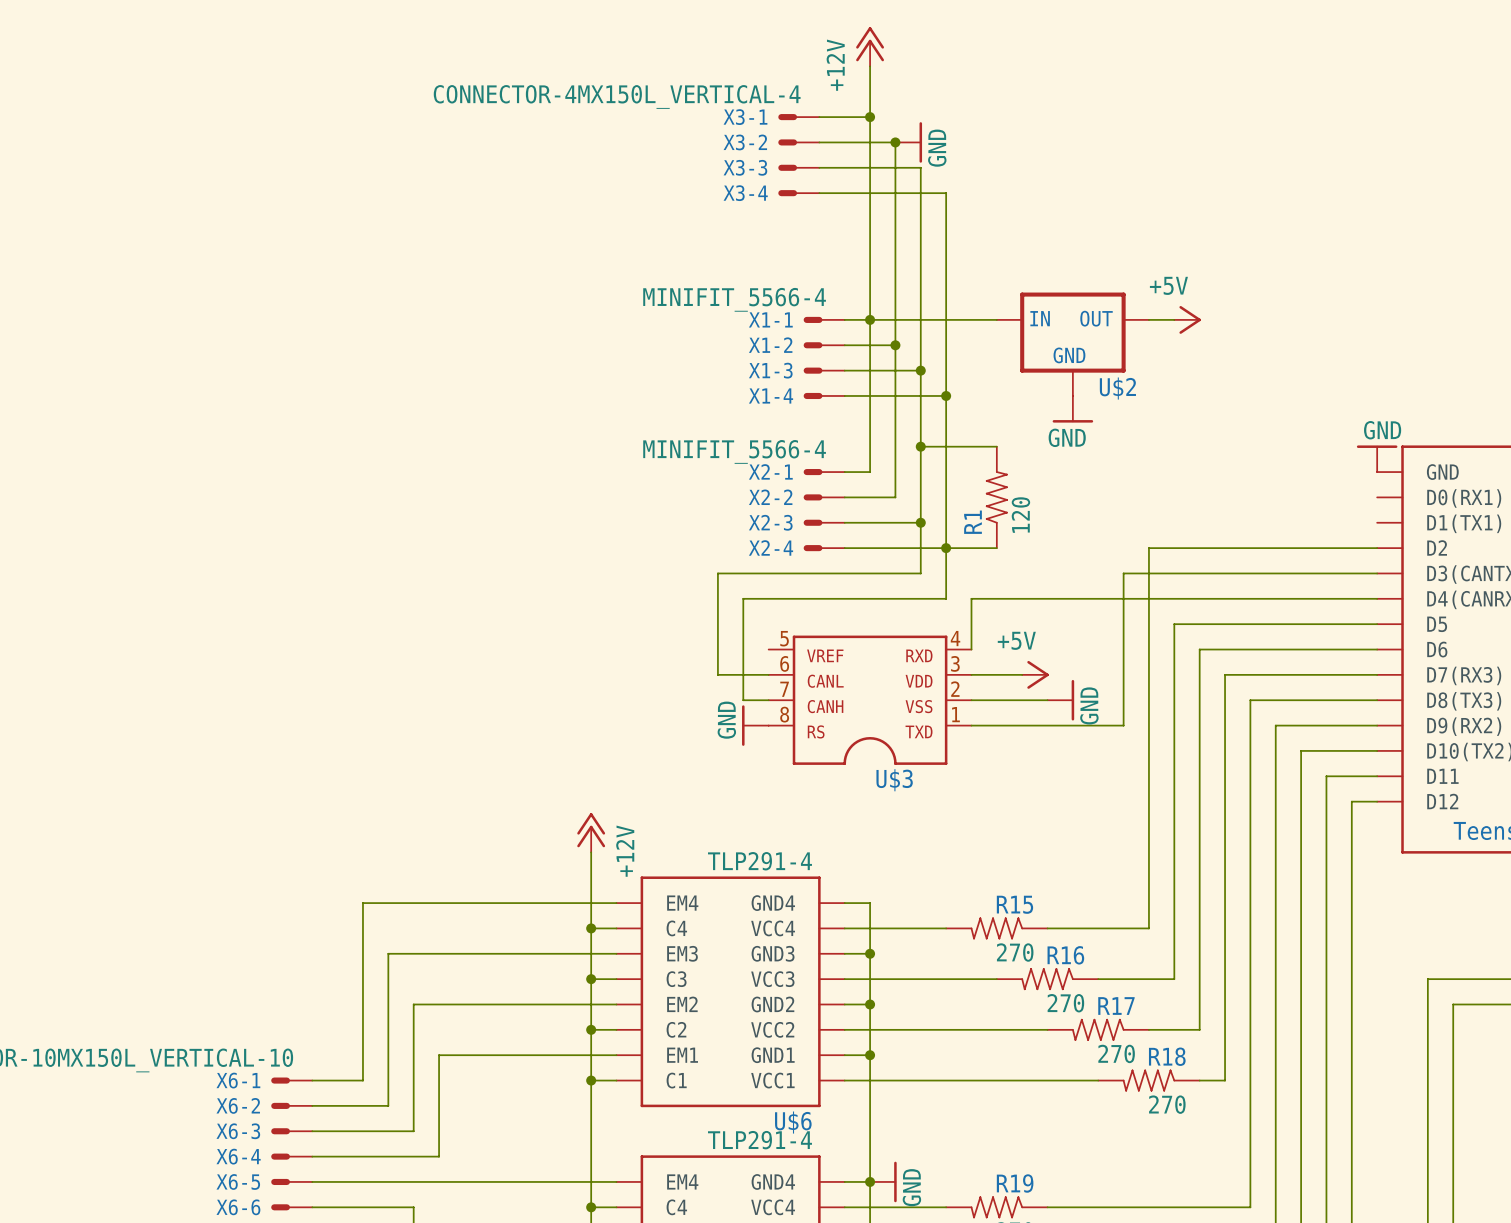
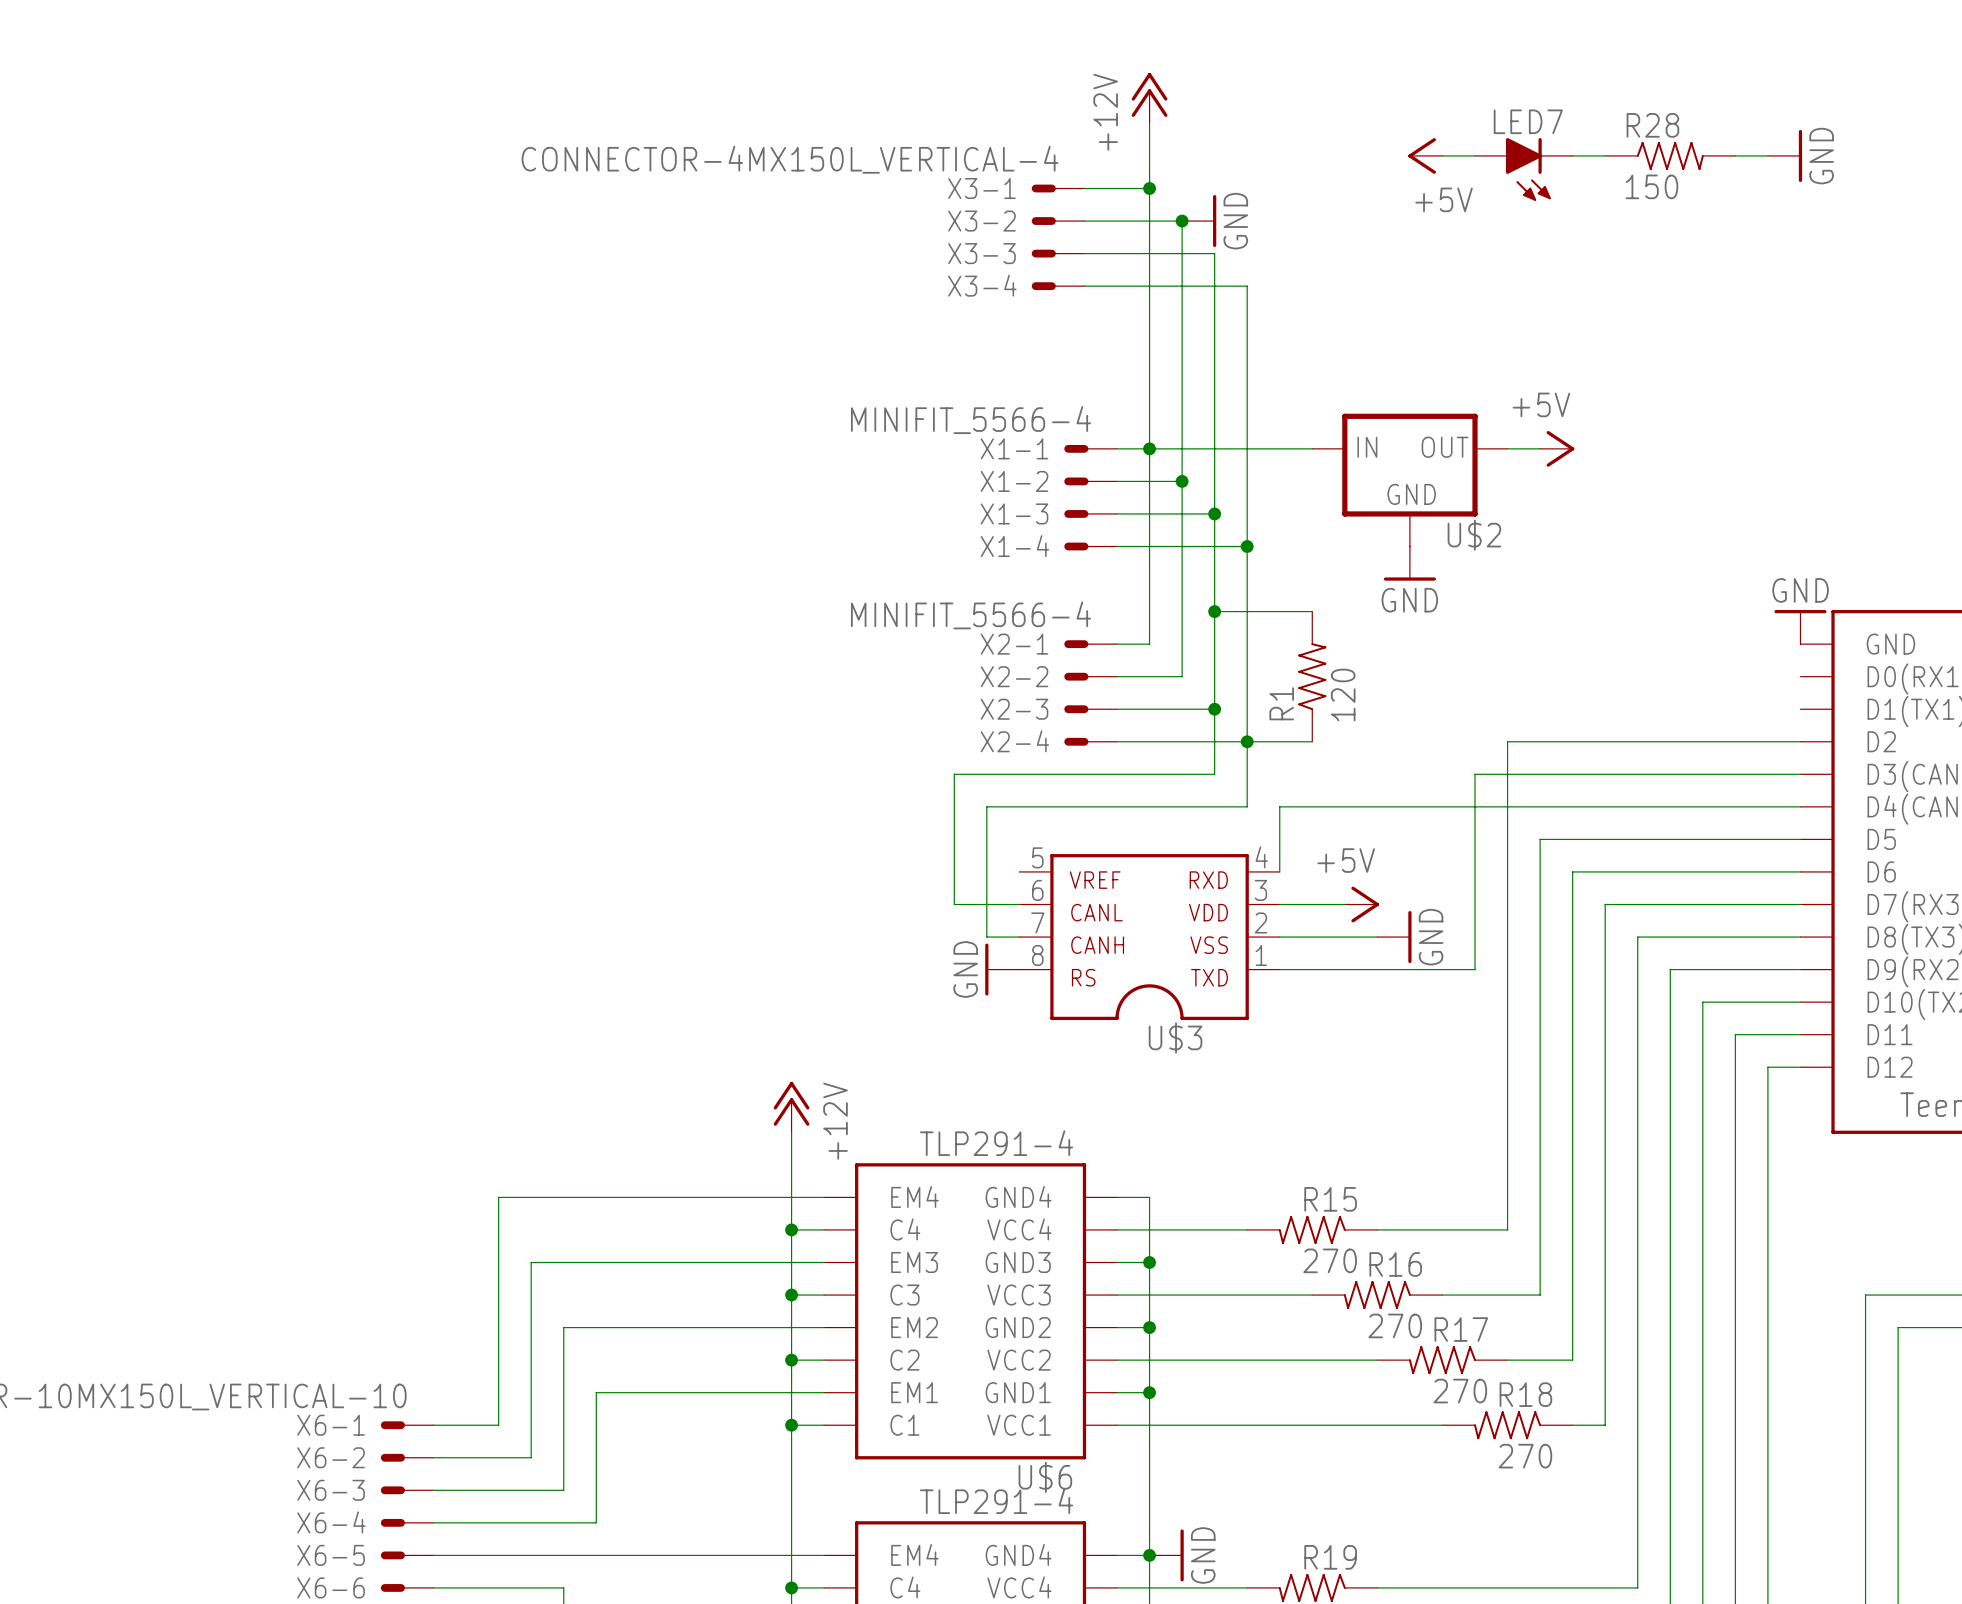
power symbol: none -> +5V (1425, 155)
wire: none -> (1442, 155) (1475, 155)
wire: none -> (1572, 155) (1605, 155)
R28: none -> 150 (1670, 155)
wire: none -> (1735, 155) (1767, 155)
power symbol: none -> GND (1785, 155)
LED7: none -> (1523, 169)

